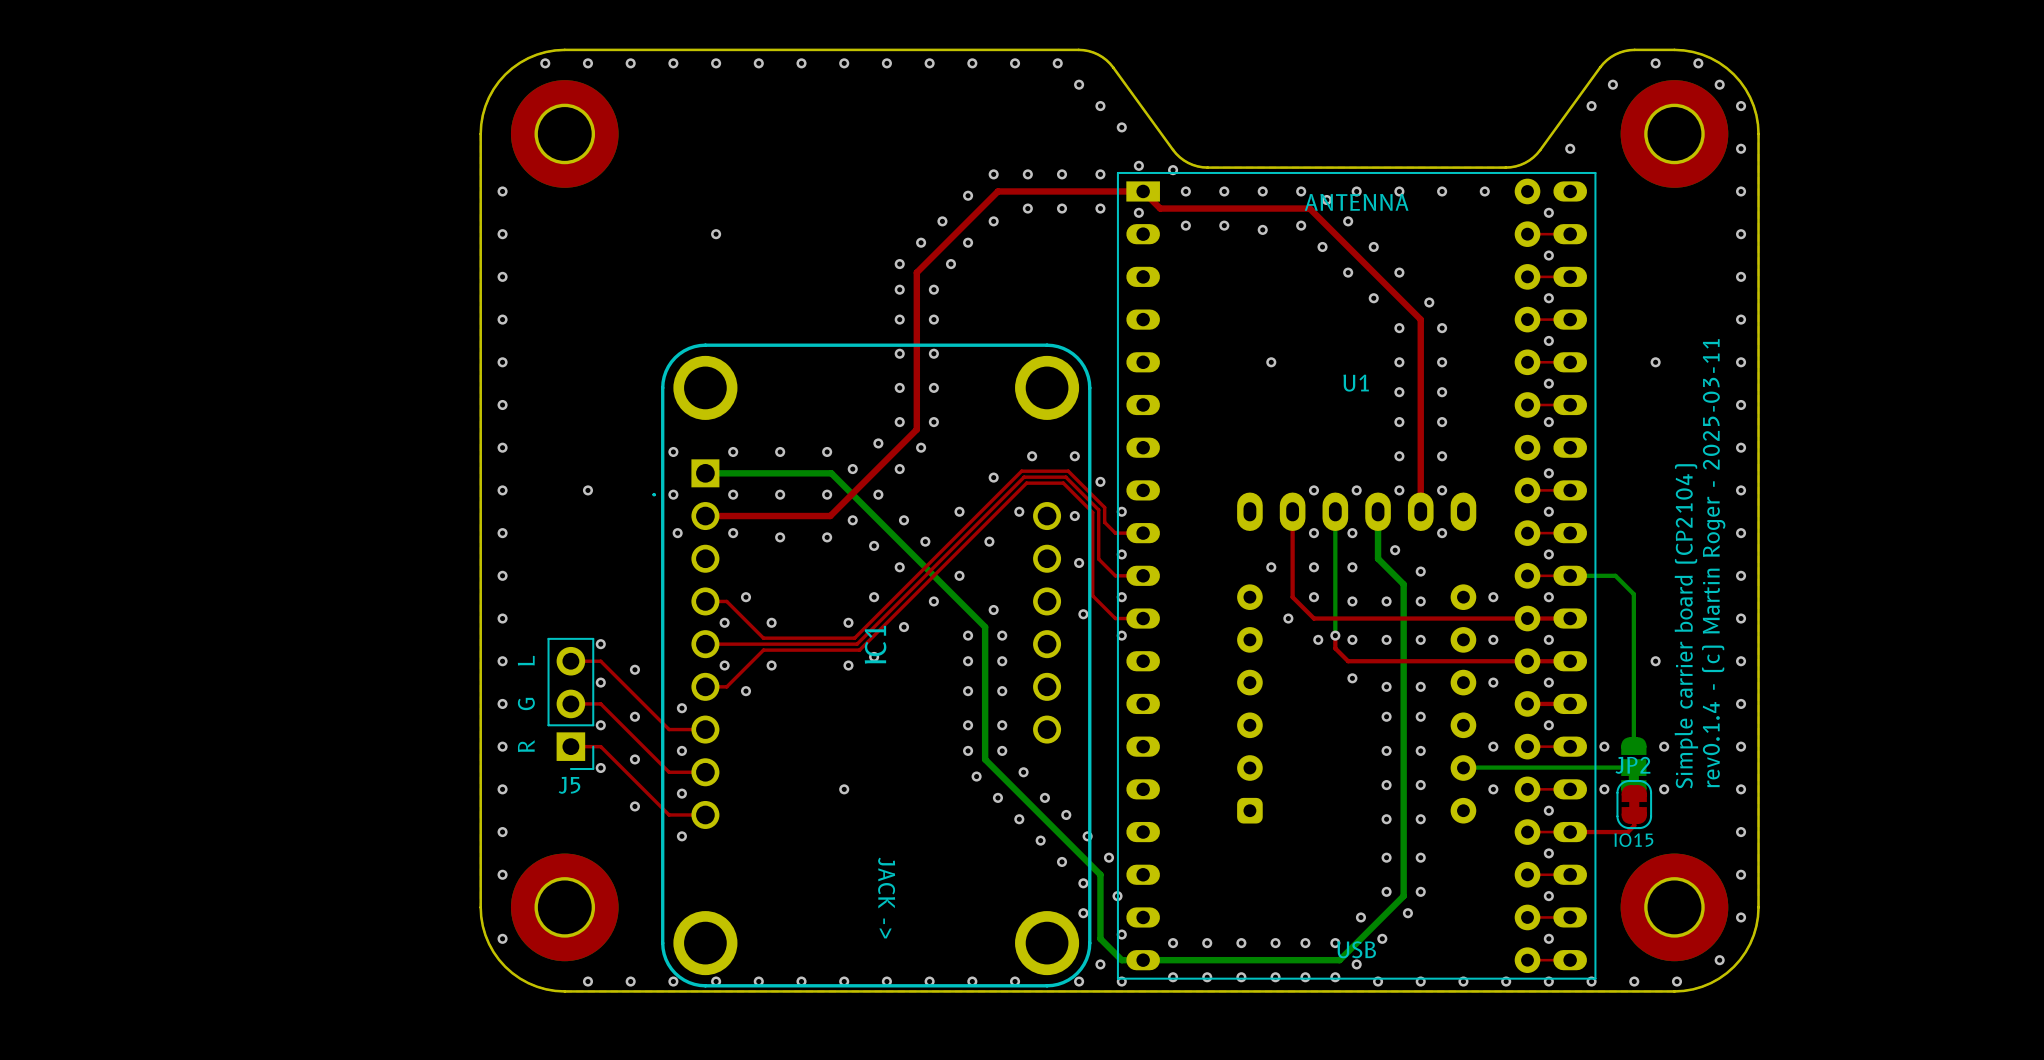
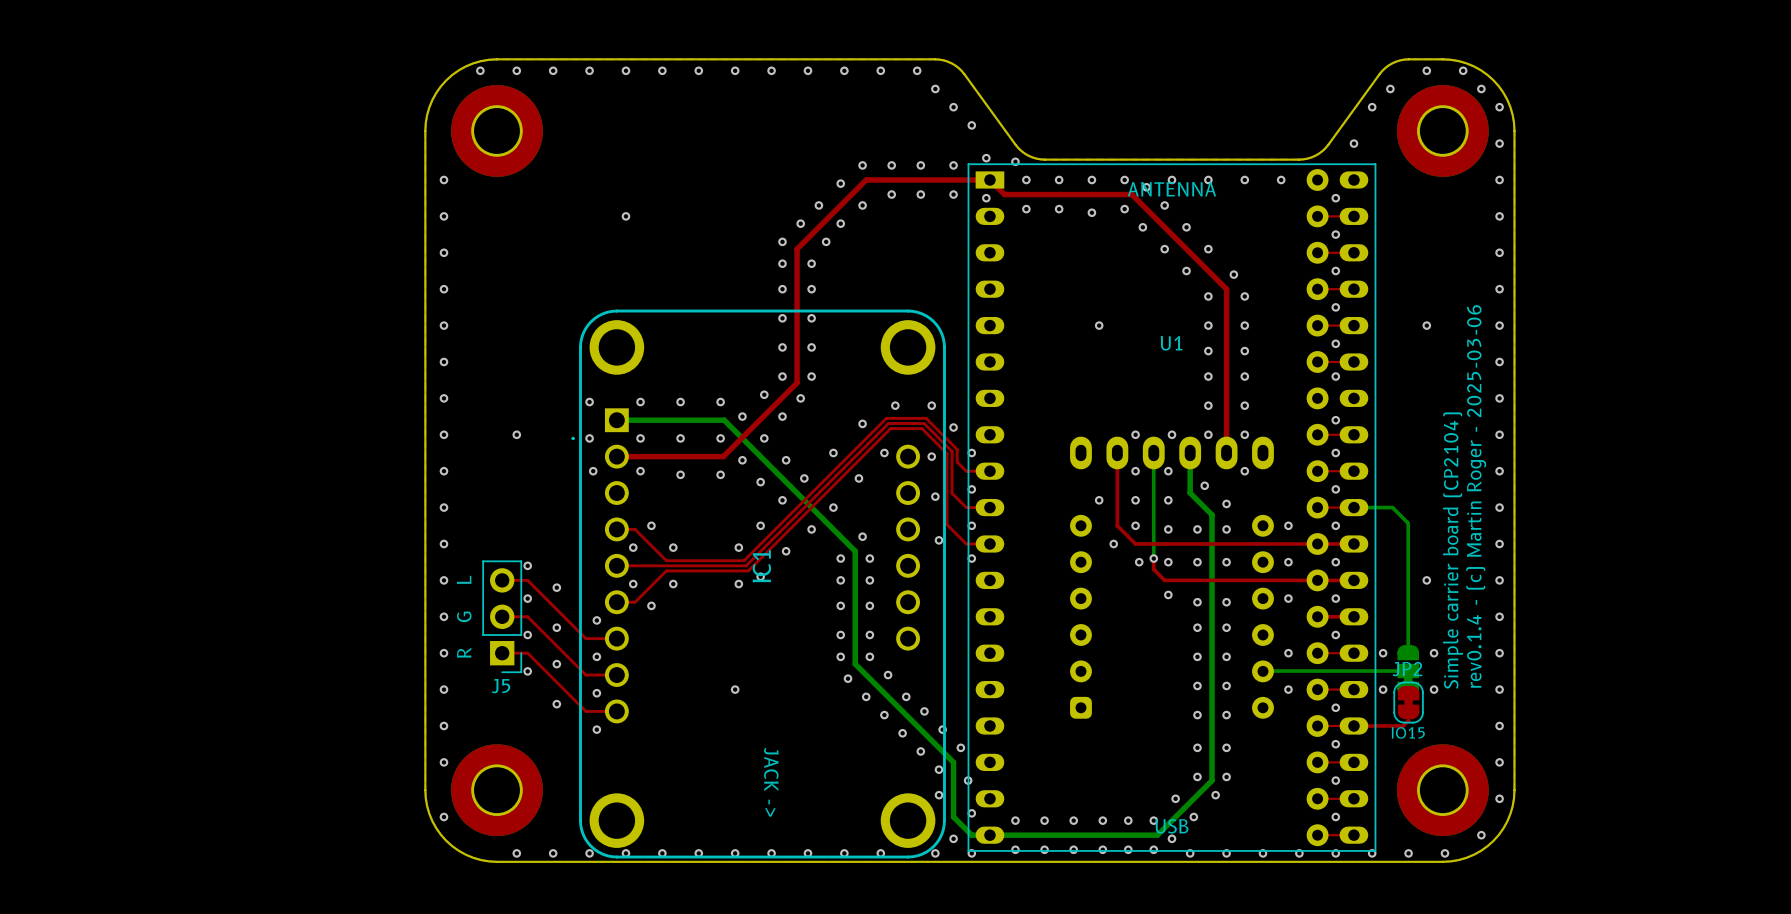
text: rev0.1.4 - (c) Martin Roger - 2025-03-11 (1713, 563) -> rev0.1.4 - (c) Martin Roger - 2025-03-06 (1476, 496)

